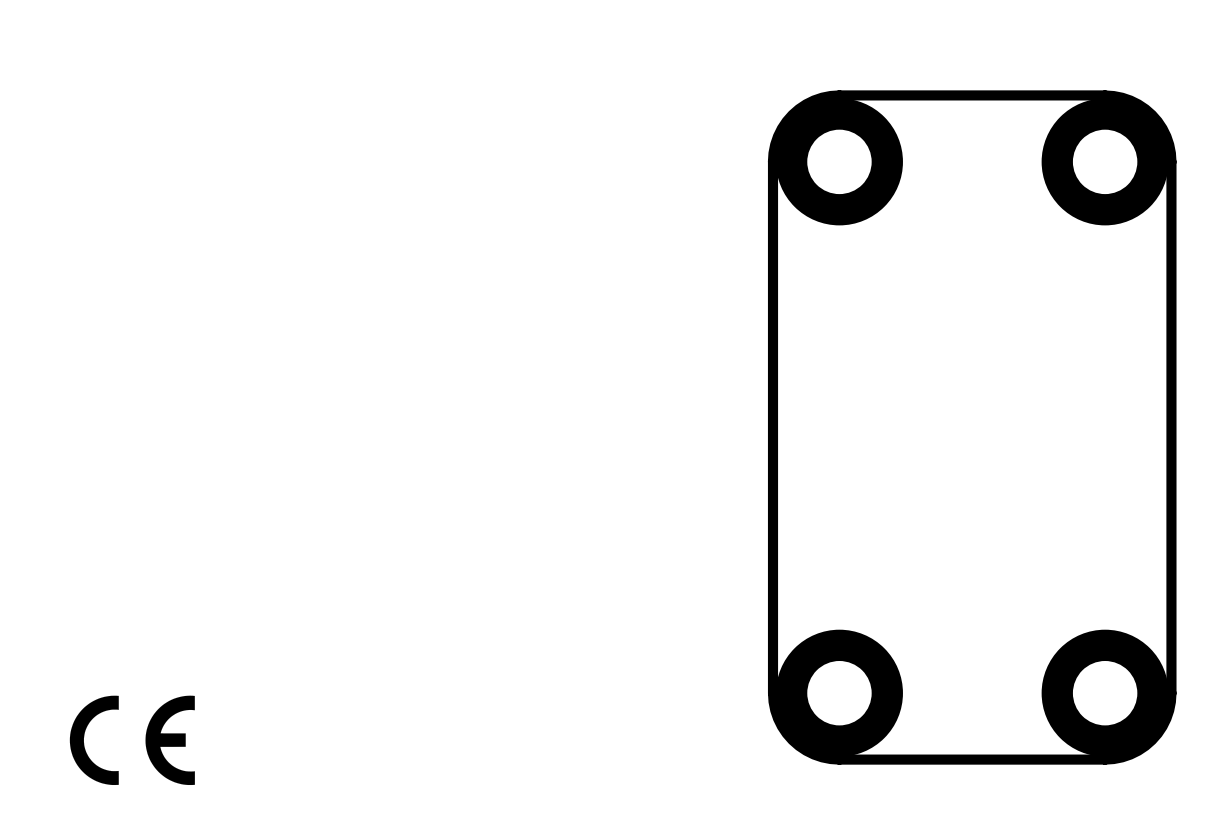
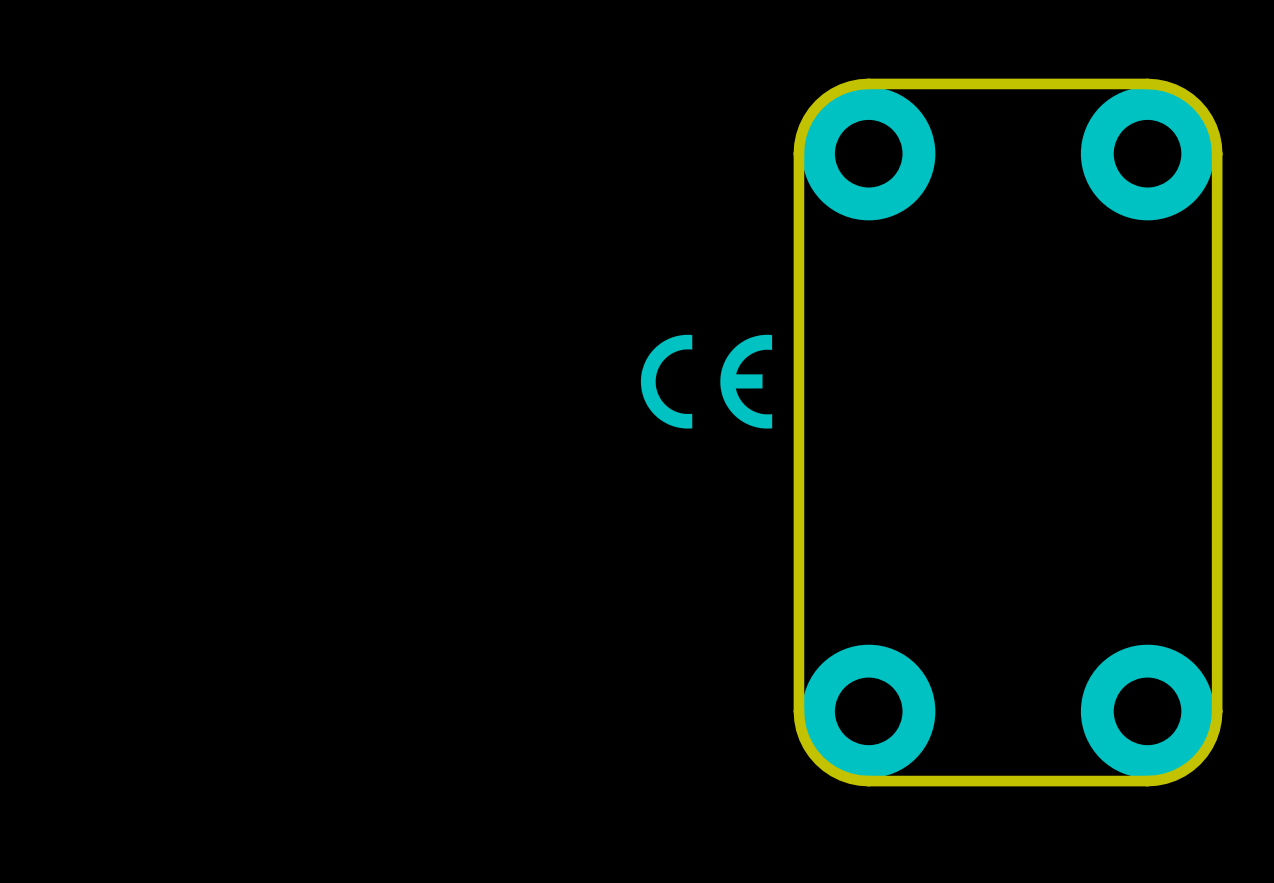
drawing position: (132, 740) -> (706, 381)

